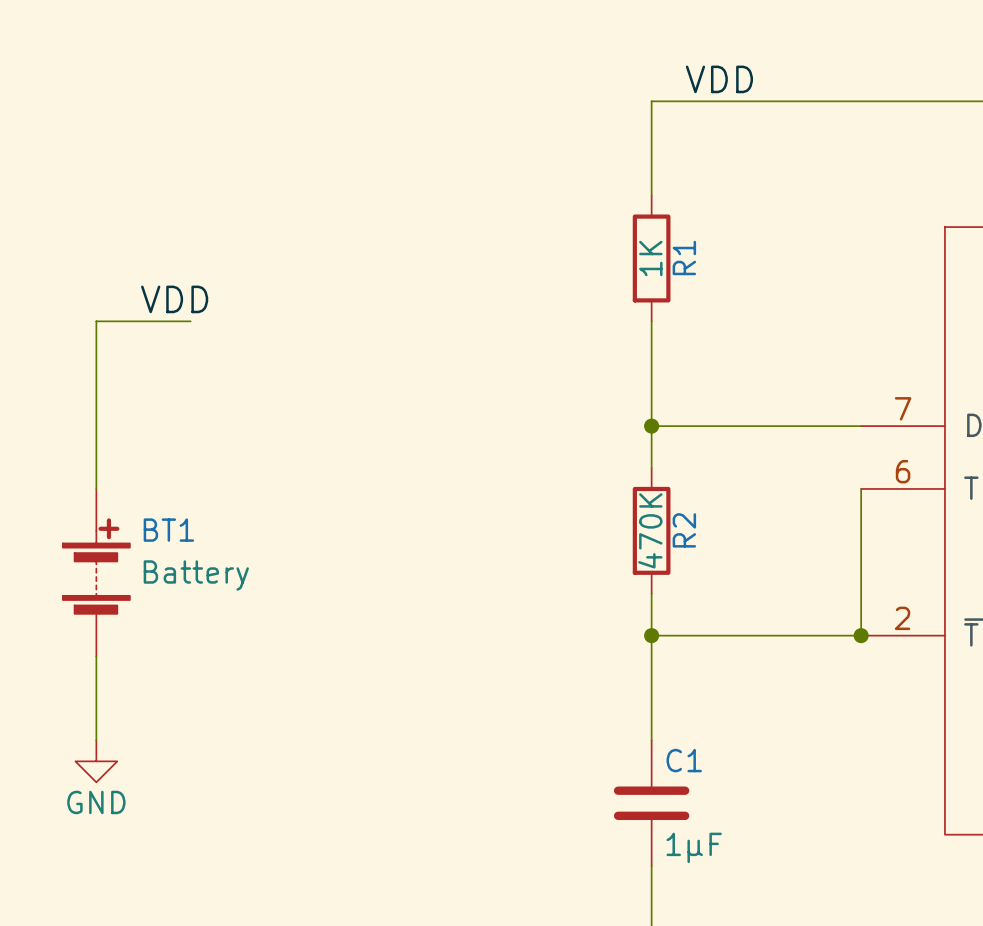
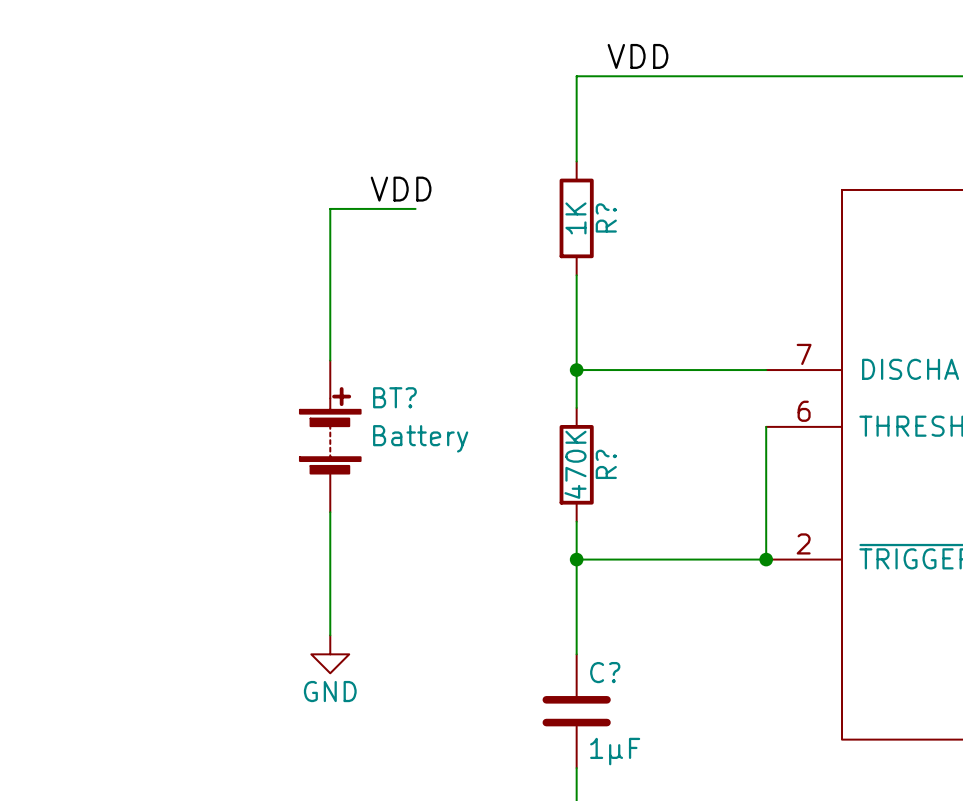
R1 name: R1 (684, 257) -> R? (606, 217)
label position: VDD (174, 299) -> VDD (401, 189)
wire: (190, 321) (96, 321) (96, 488) -> (415, 208) (330, 208) (330, 360)
BT?: none -> Battery (330, 436)
R2 name: R2 (684, 530) -> R? (606, 464)
BT1: Battery (96, 572) -> none
wire: none -> (330, 512) (330, 635)
wire: (96, 656) (96, 740) -> none
C1 name: C1 (684, 760) -> C? (605, 672)
power symbol position: GND (96, 761) -> GND (330, 654)

